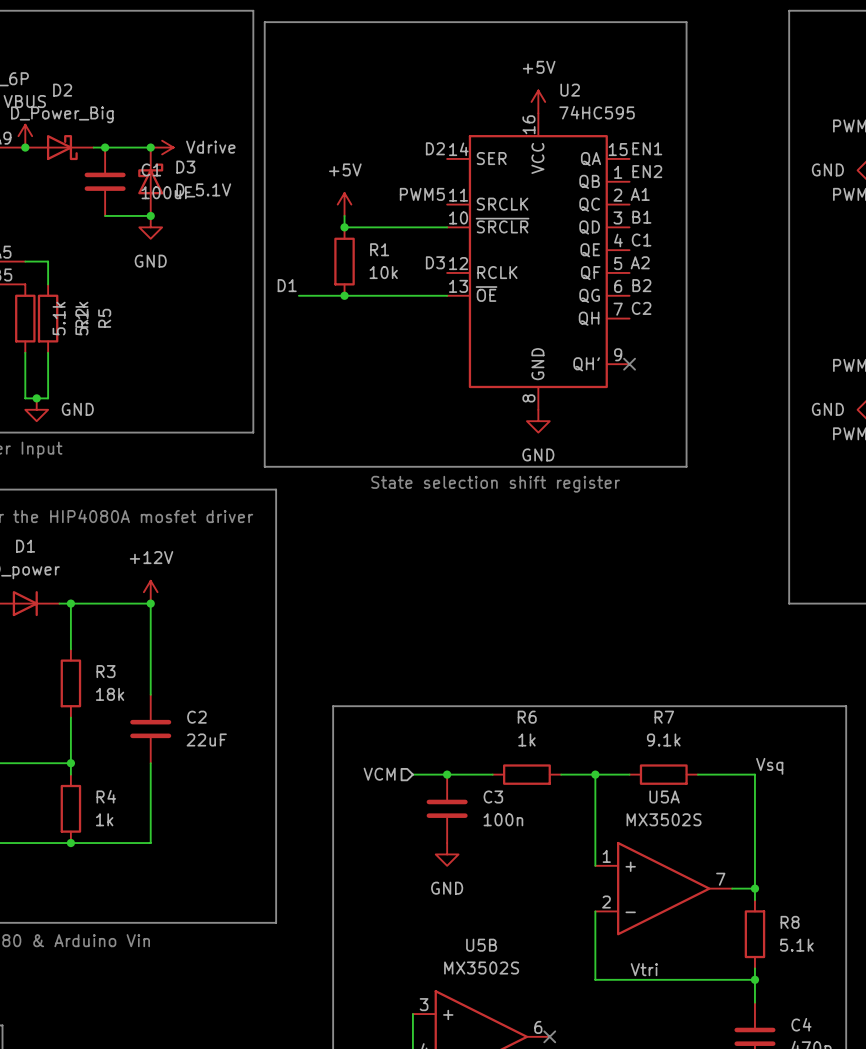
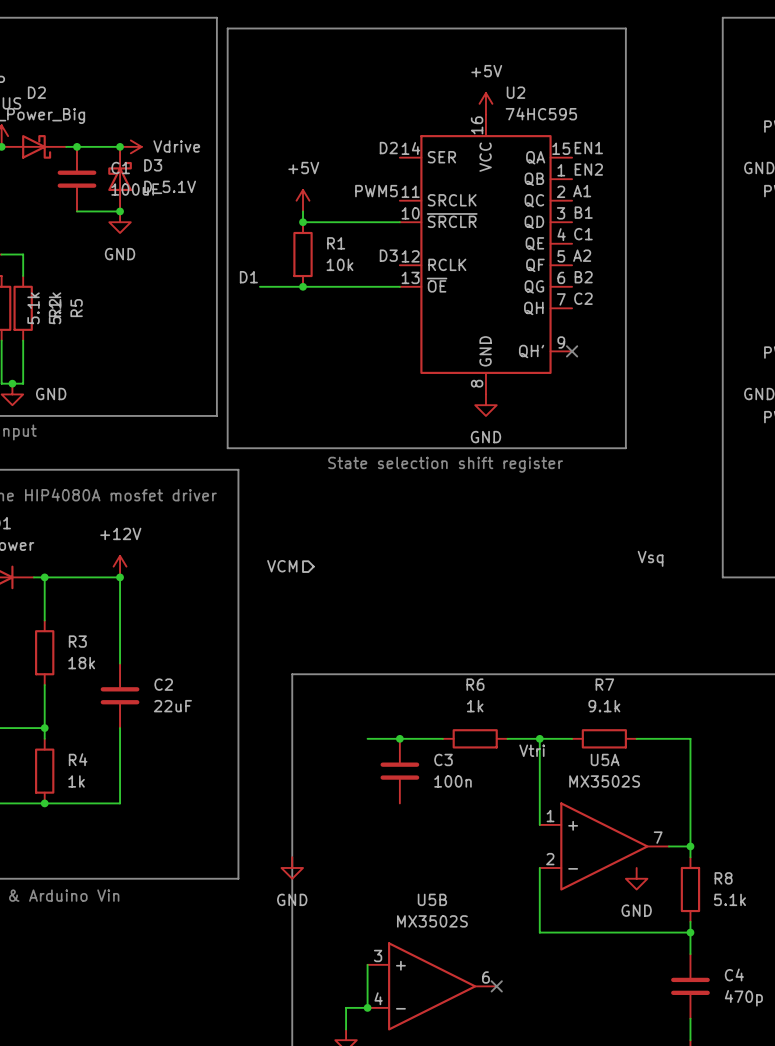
label position: Vsq (769, 766) -> Vsq (650, 558)
hierarchical label position: VCM (379, 774) -> VCM (282, 566)
label: none -> Vtri (532, 750)
power symbol position: GND (447, 854) -> GND (292, 867)
power symbol: none -> GND (636, 878)
label: Vtri (644, 969) -> none

